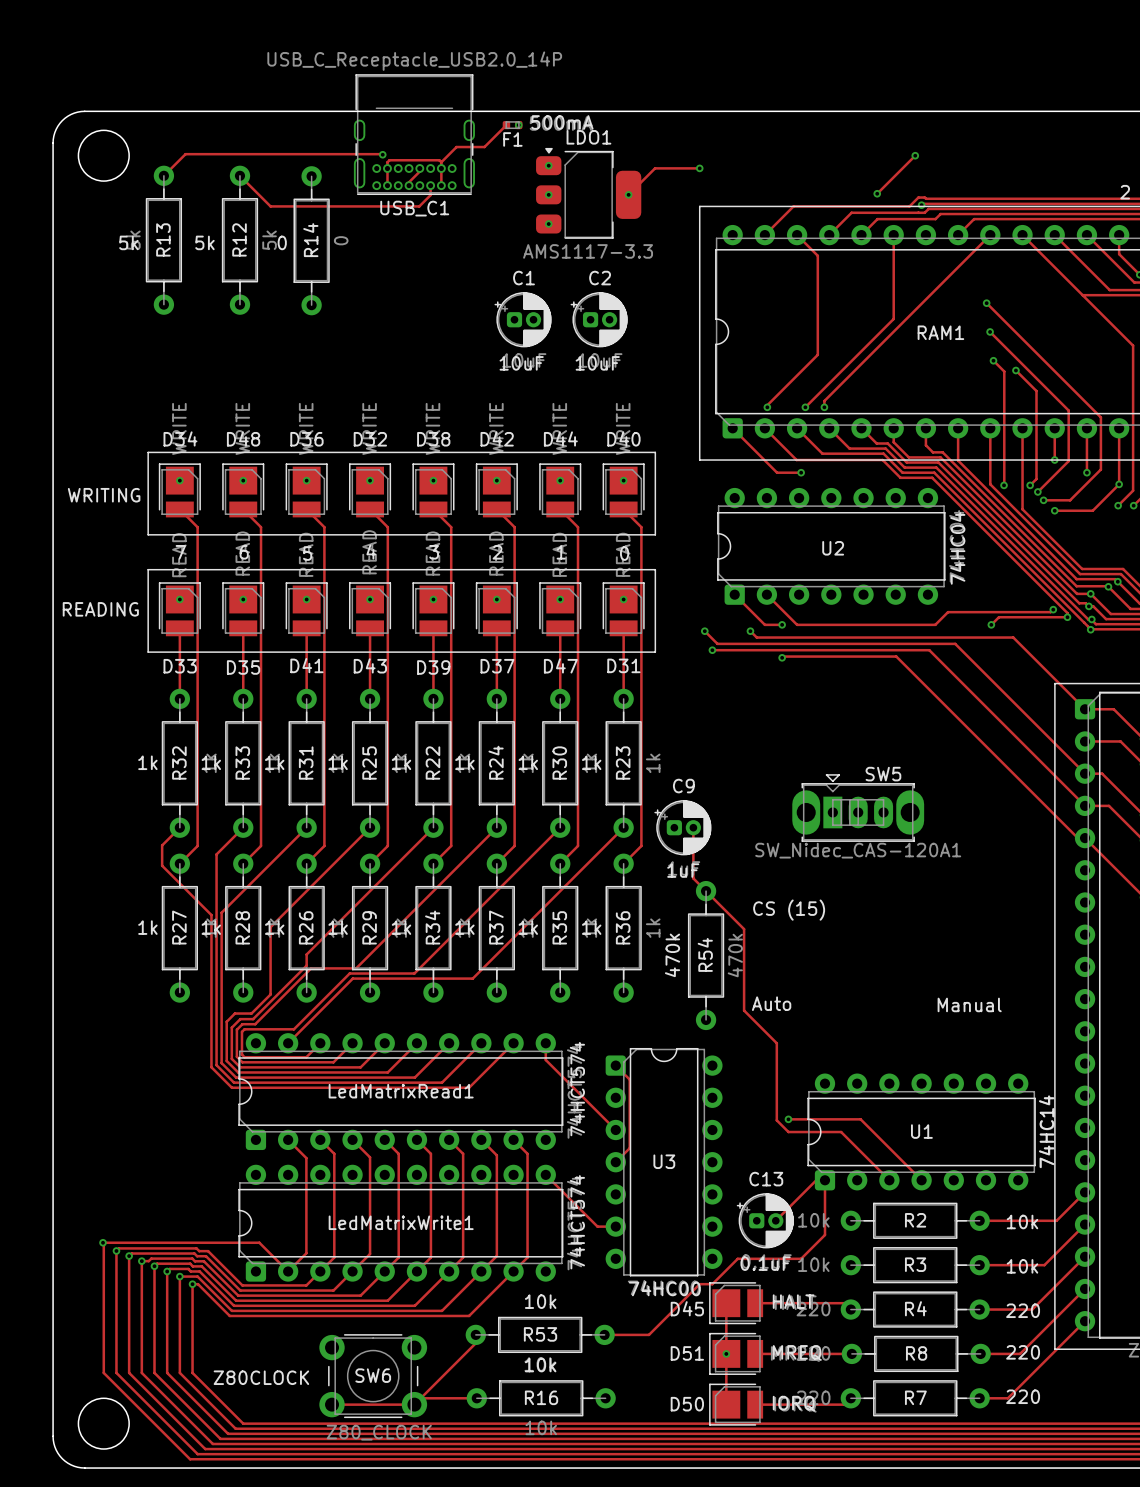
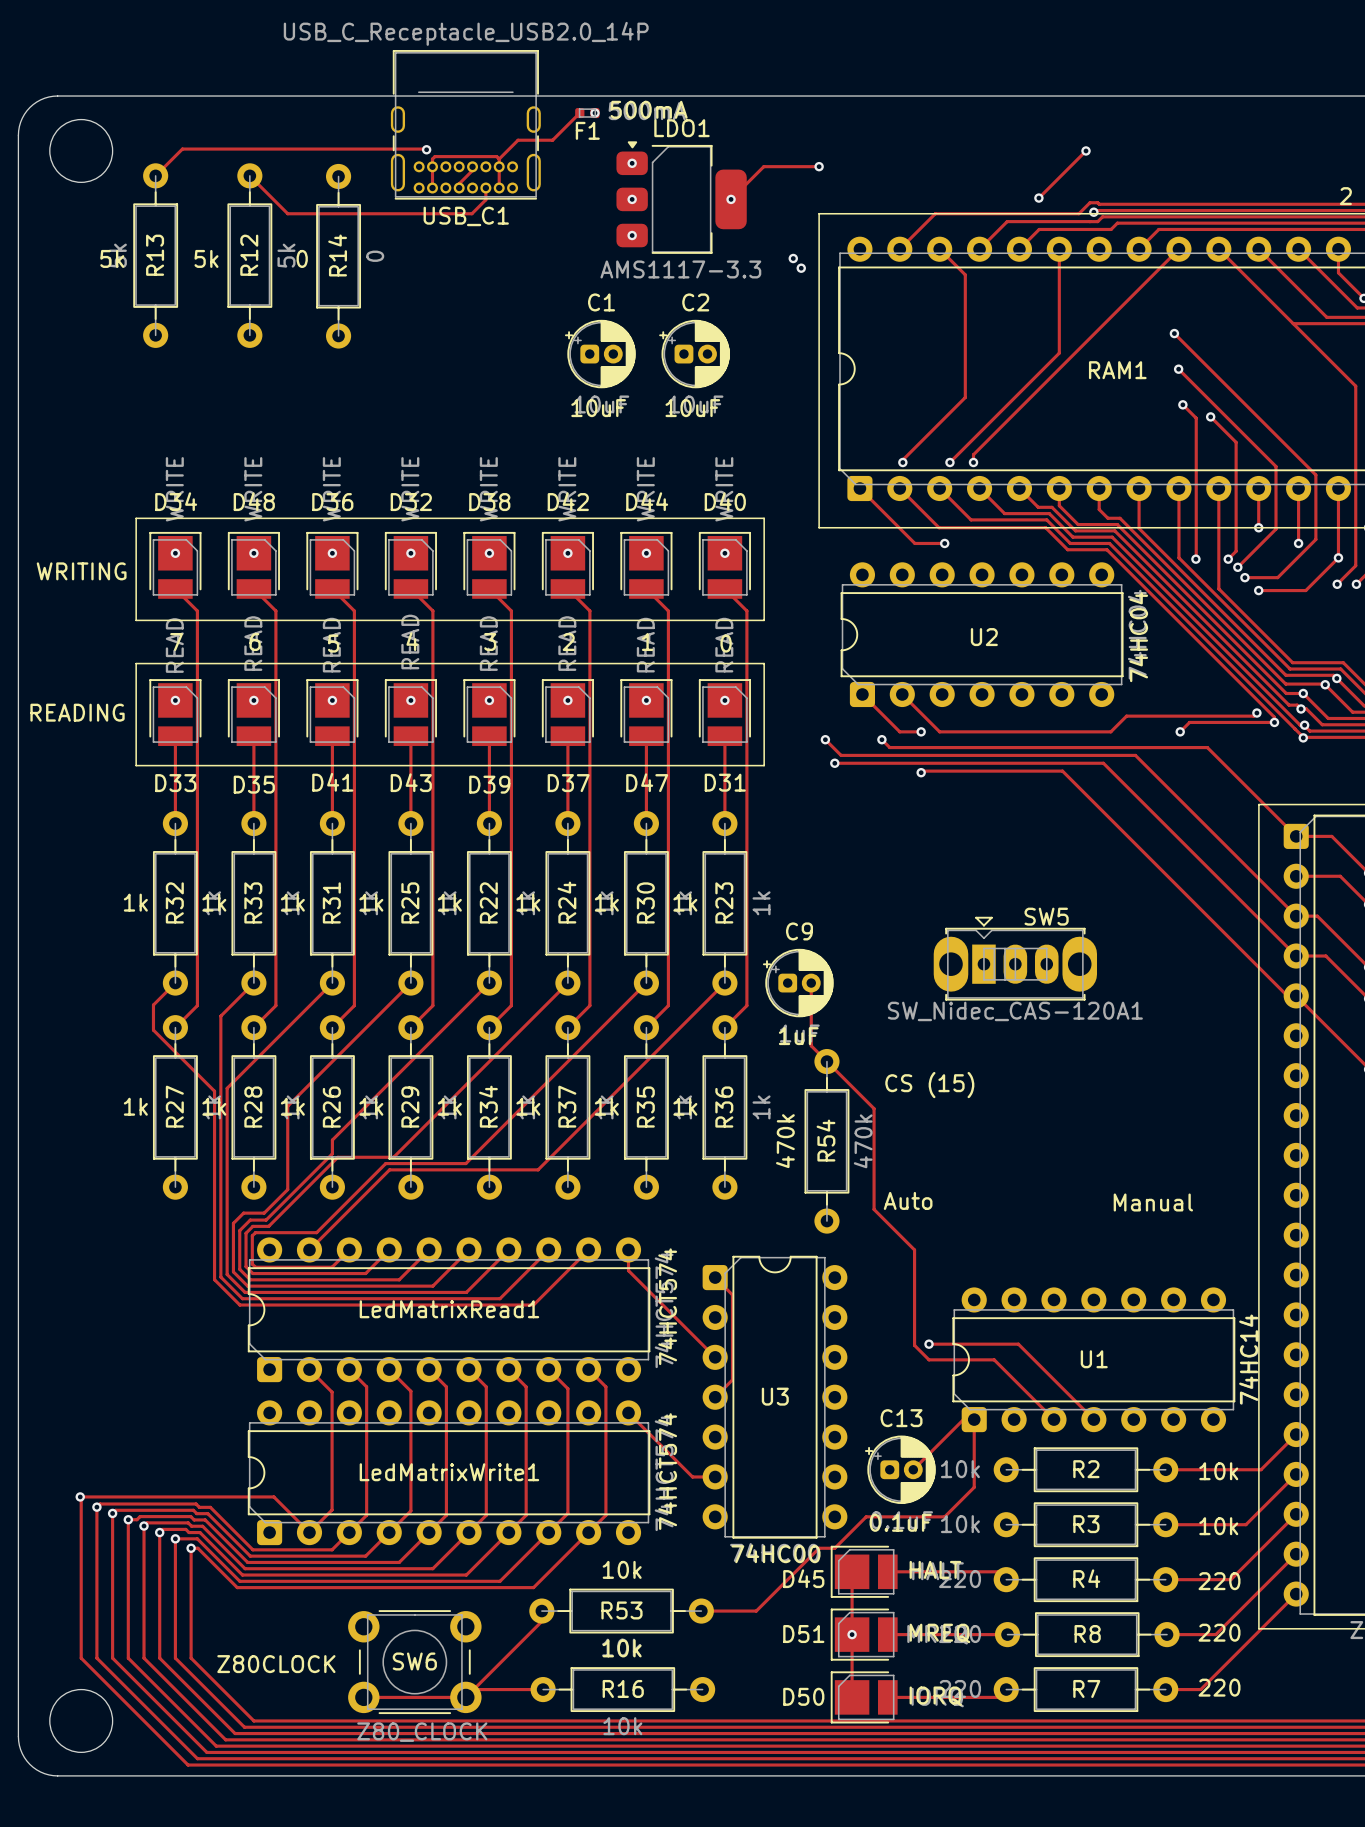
via: none -> (793, 258)
via: none -> (801, 268)

